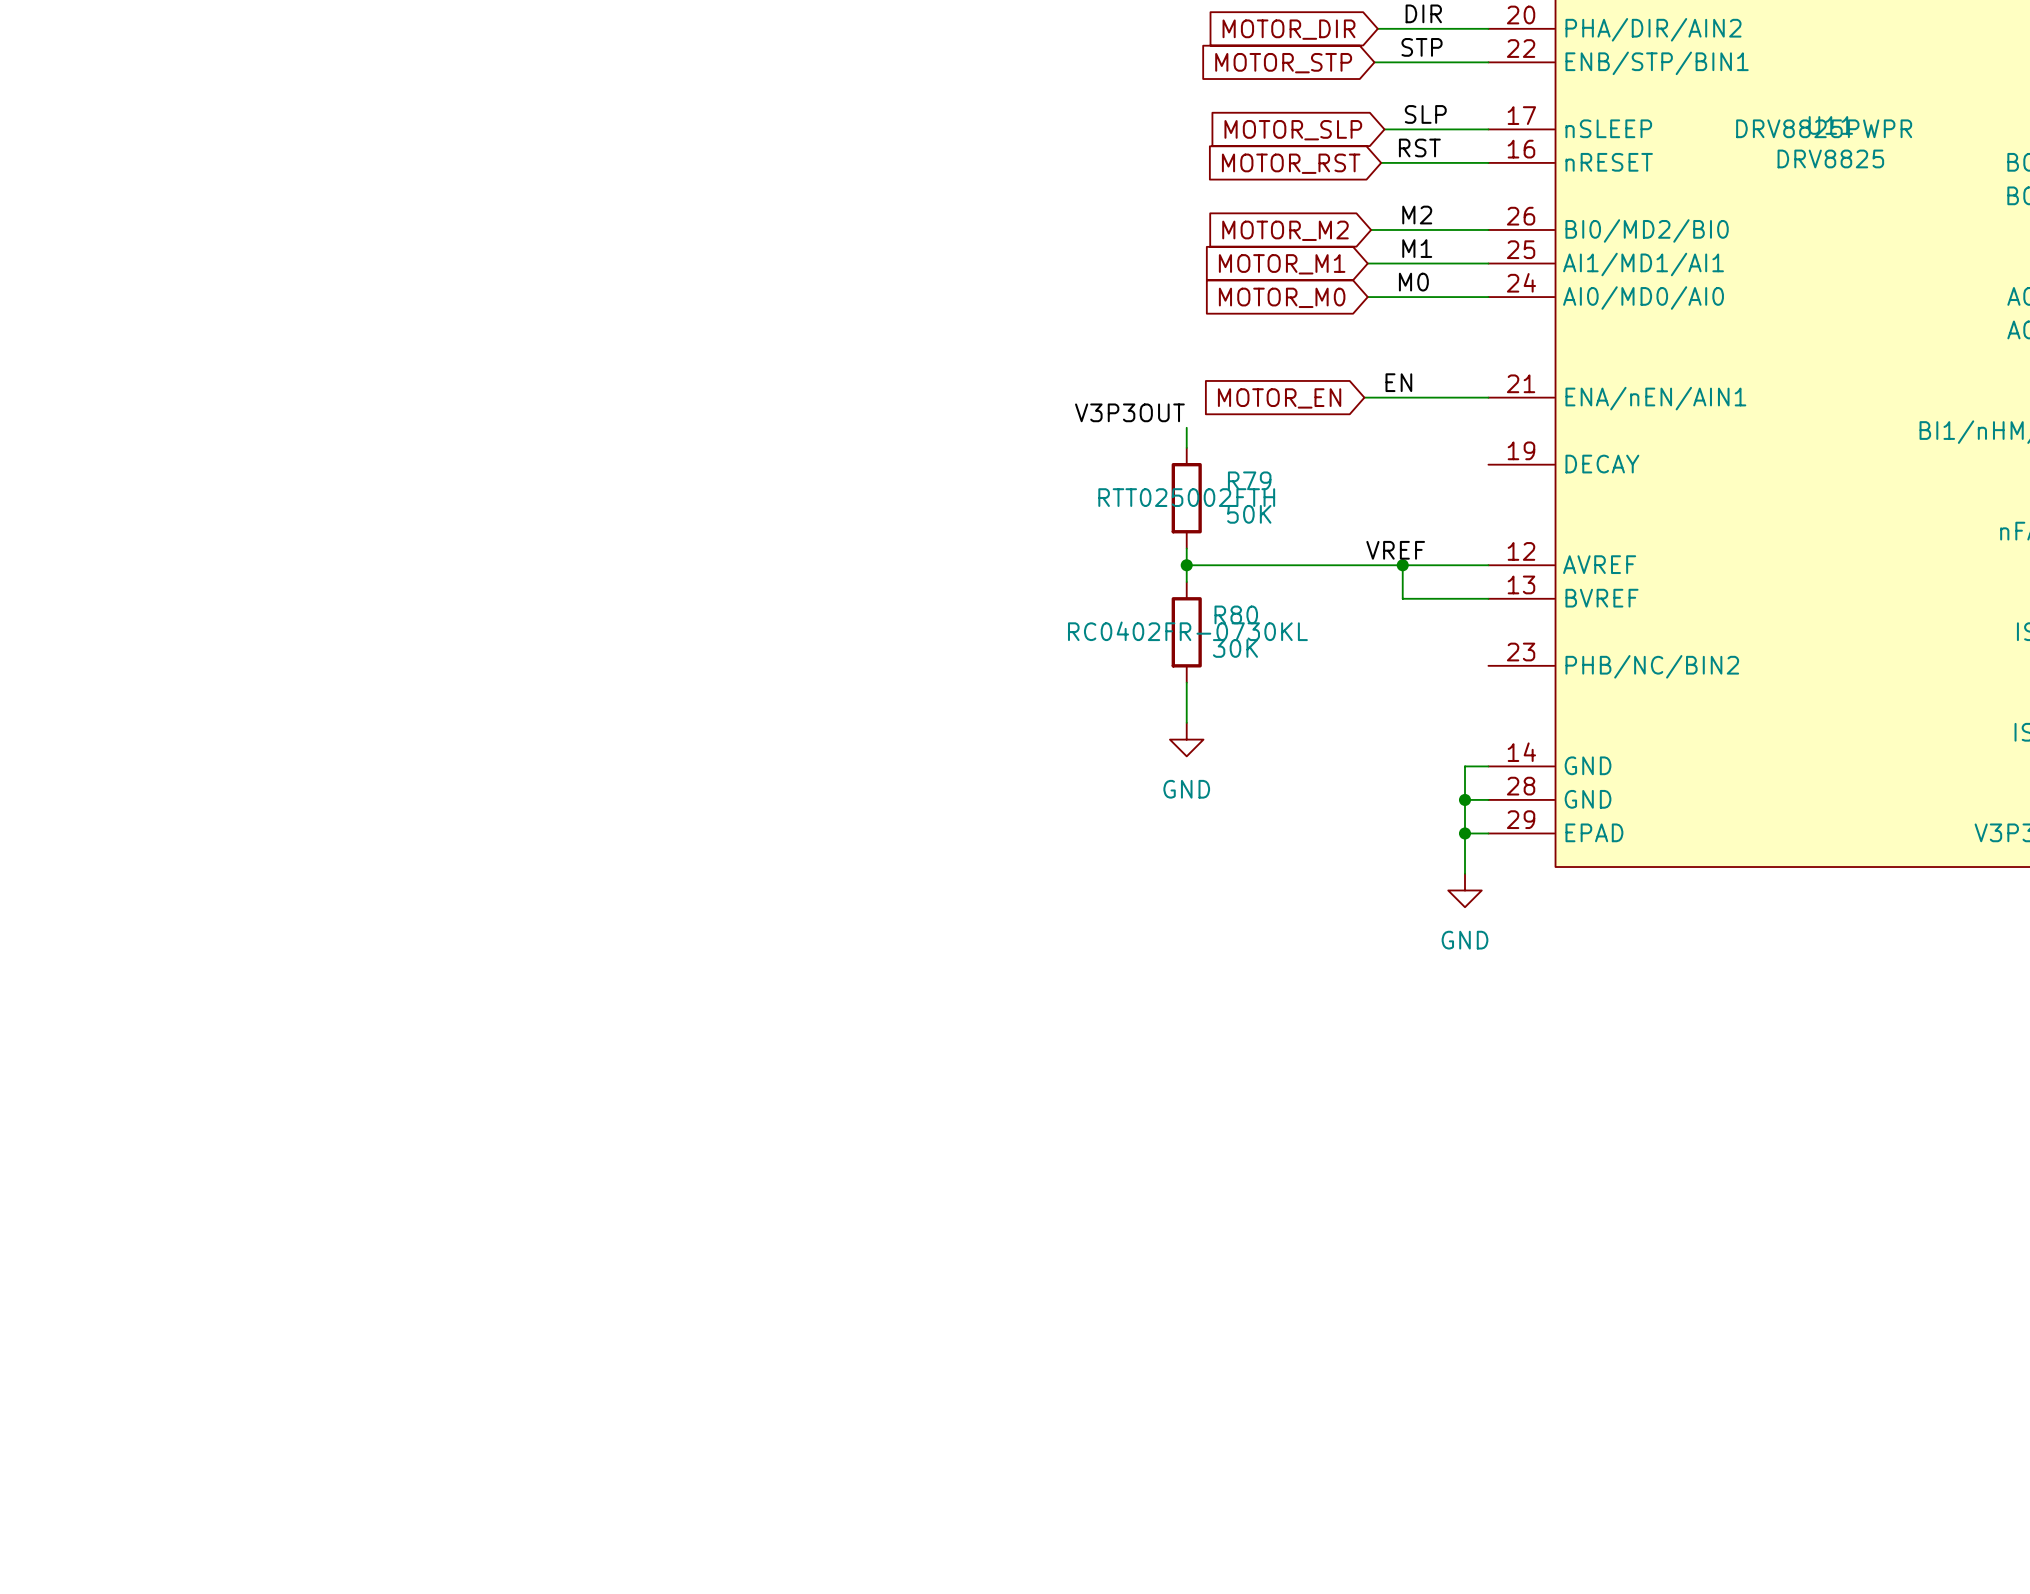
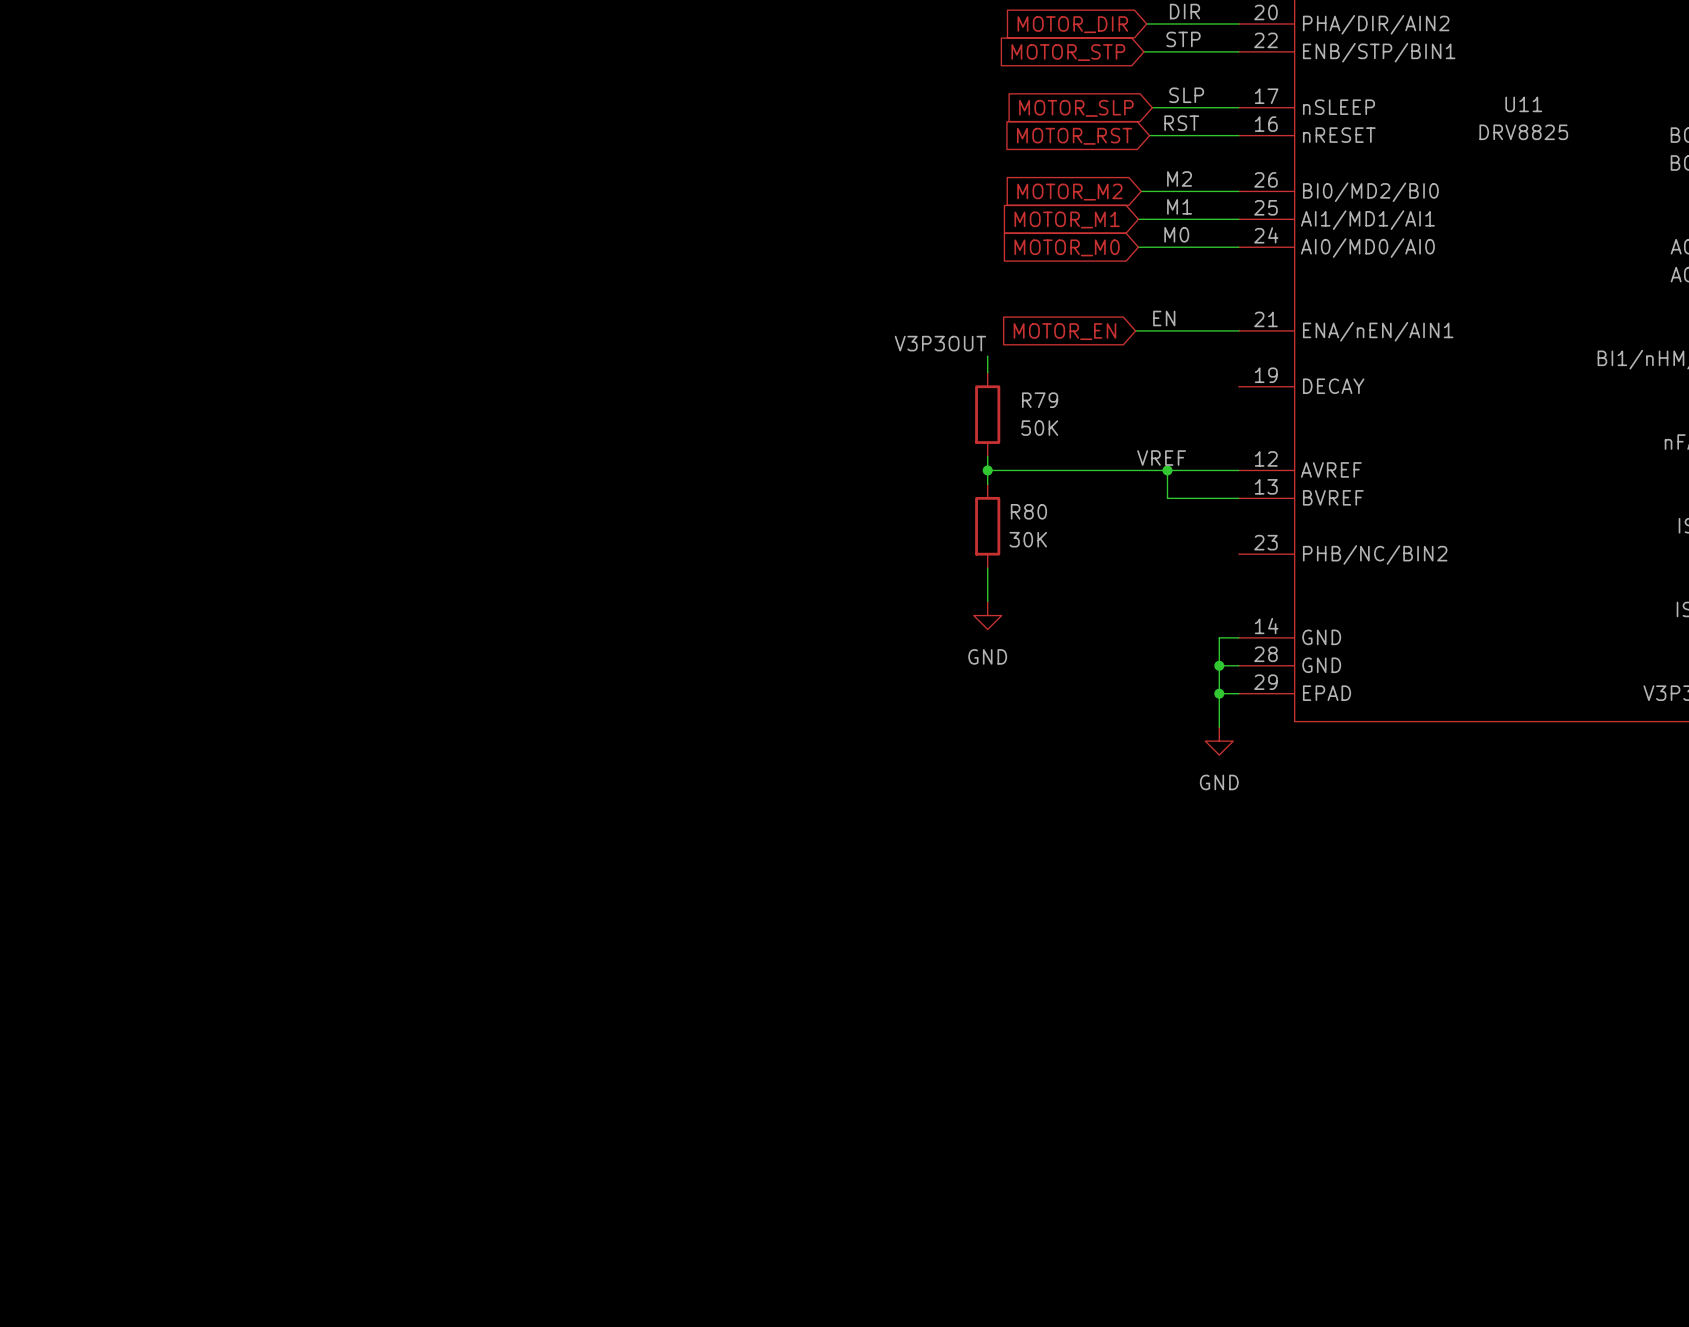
U11 text: DRV8825PWPR (1824, 128) -> none
R79 text: RTT025002FTH (1186, 497) -> none
R80 text: RC0402FR-0730KL (1187, 631) -> none

